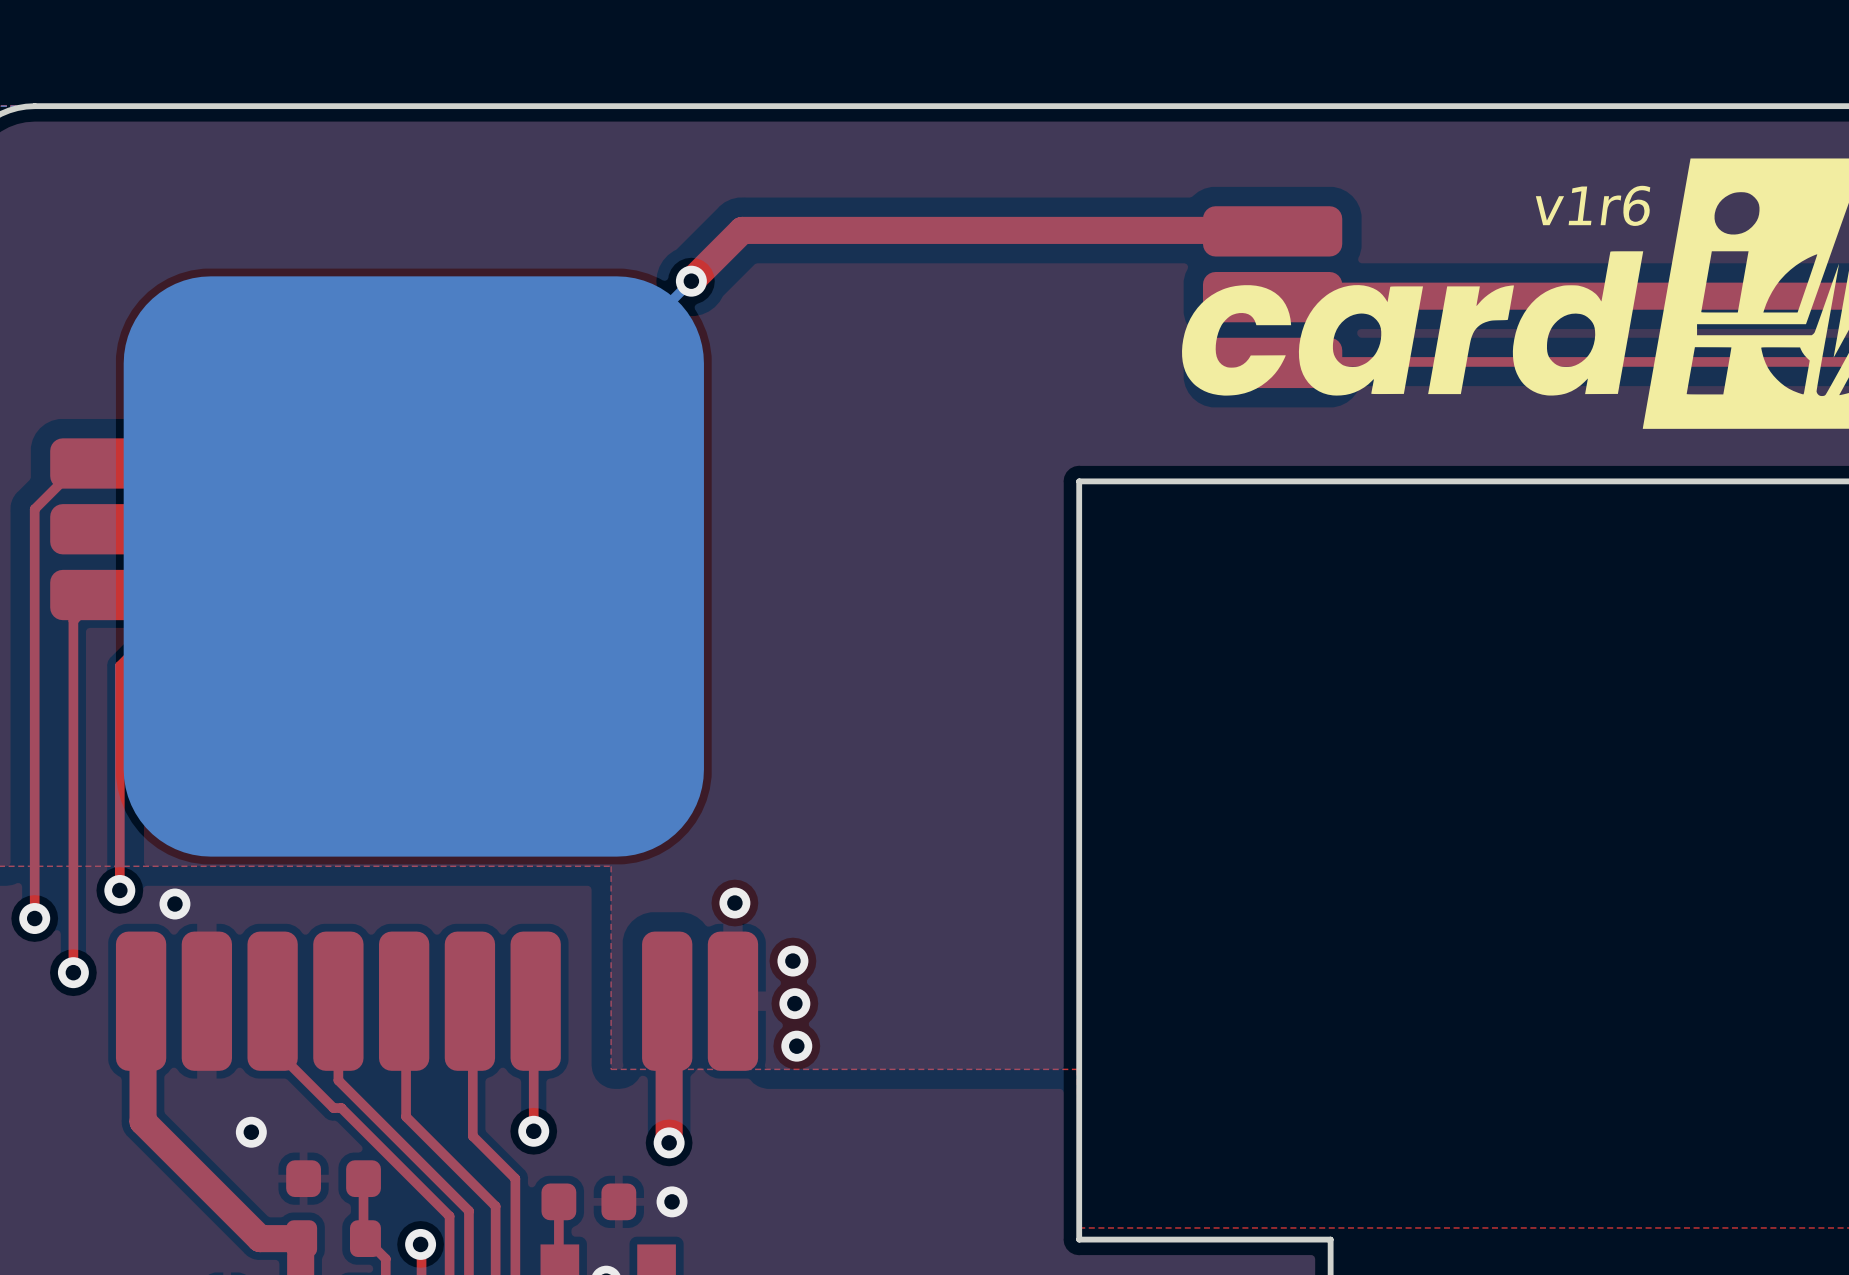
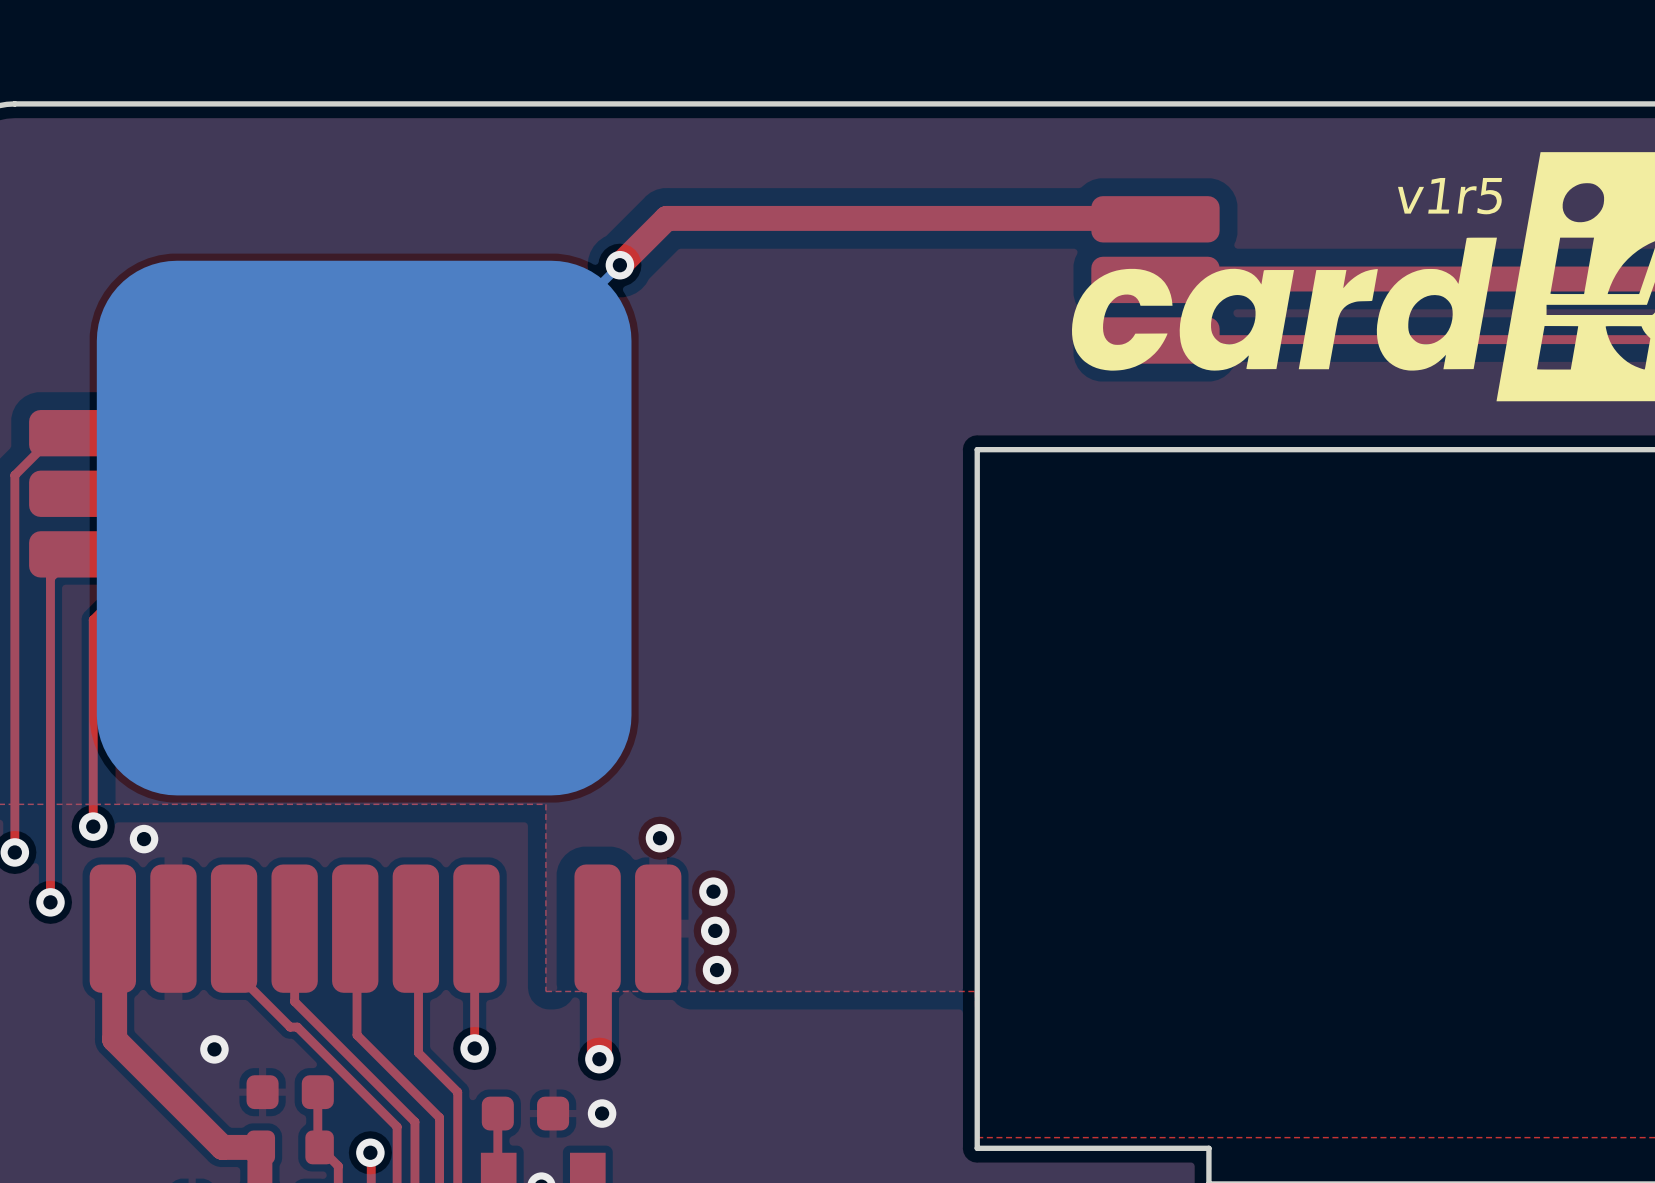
text: v1r6 (1593, 205) -> v1r5 (1450, 196)

